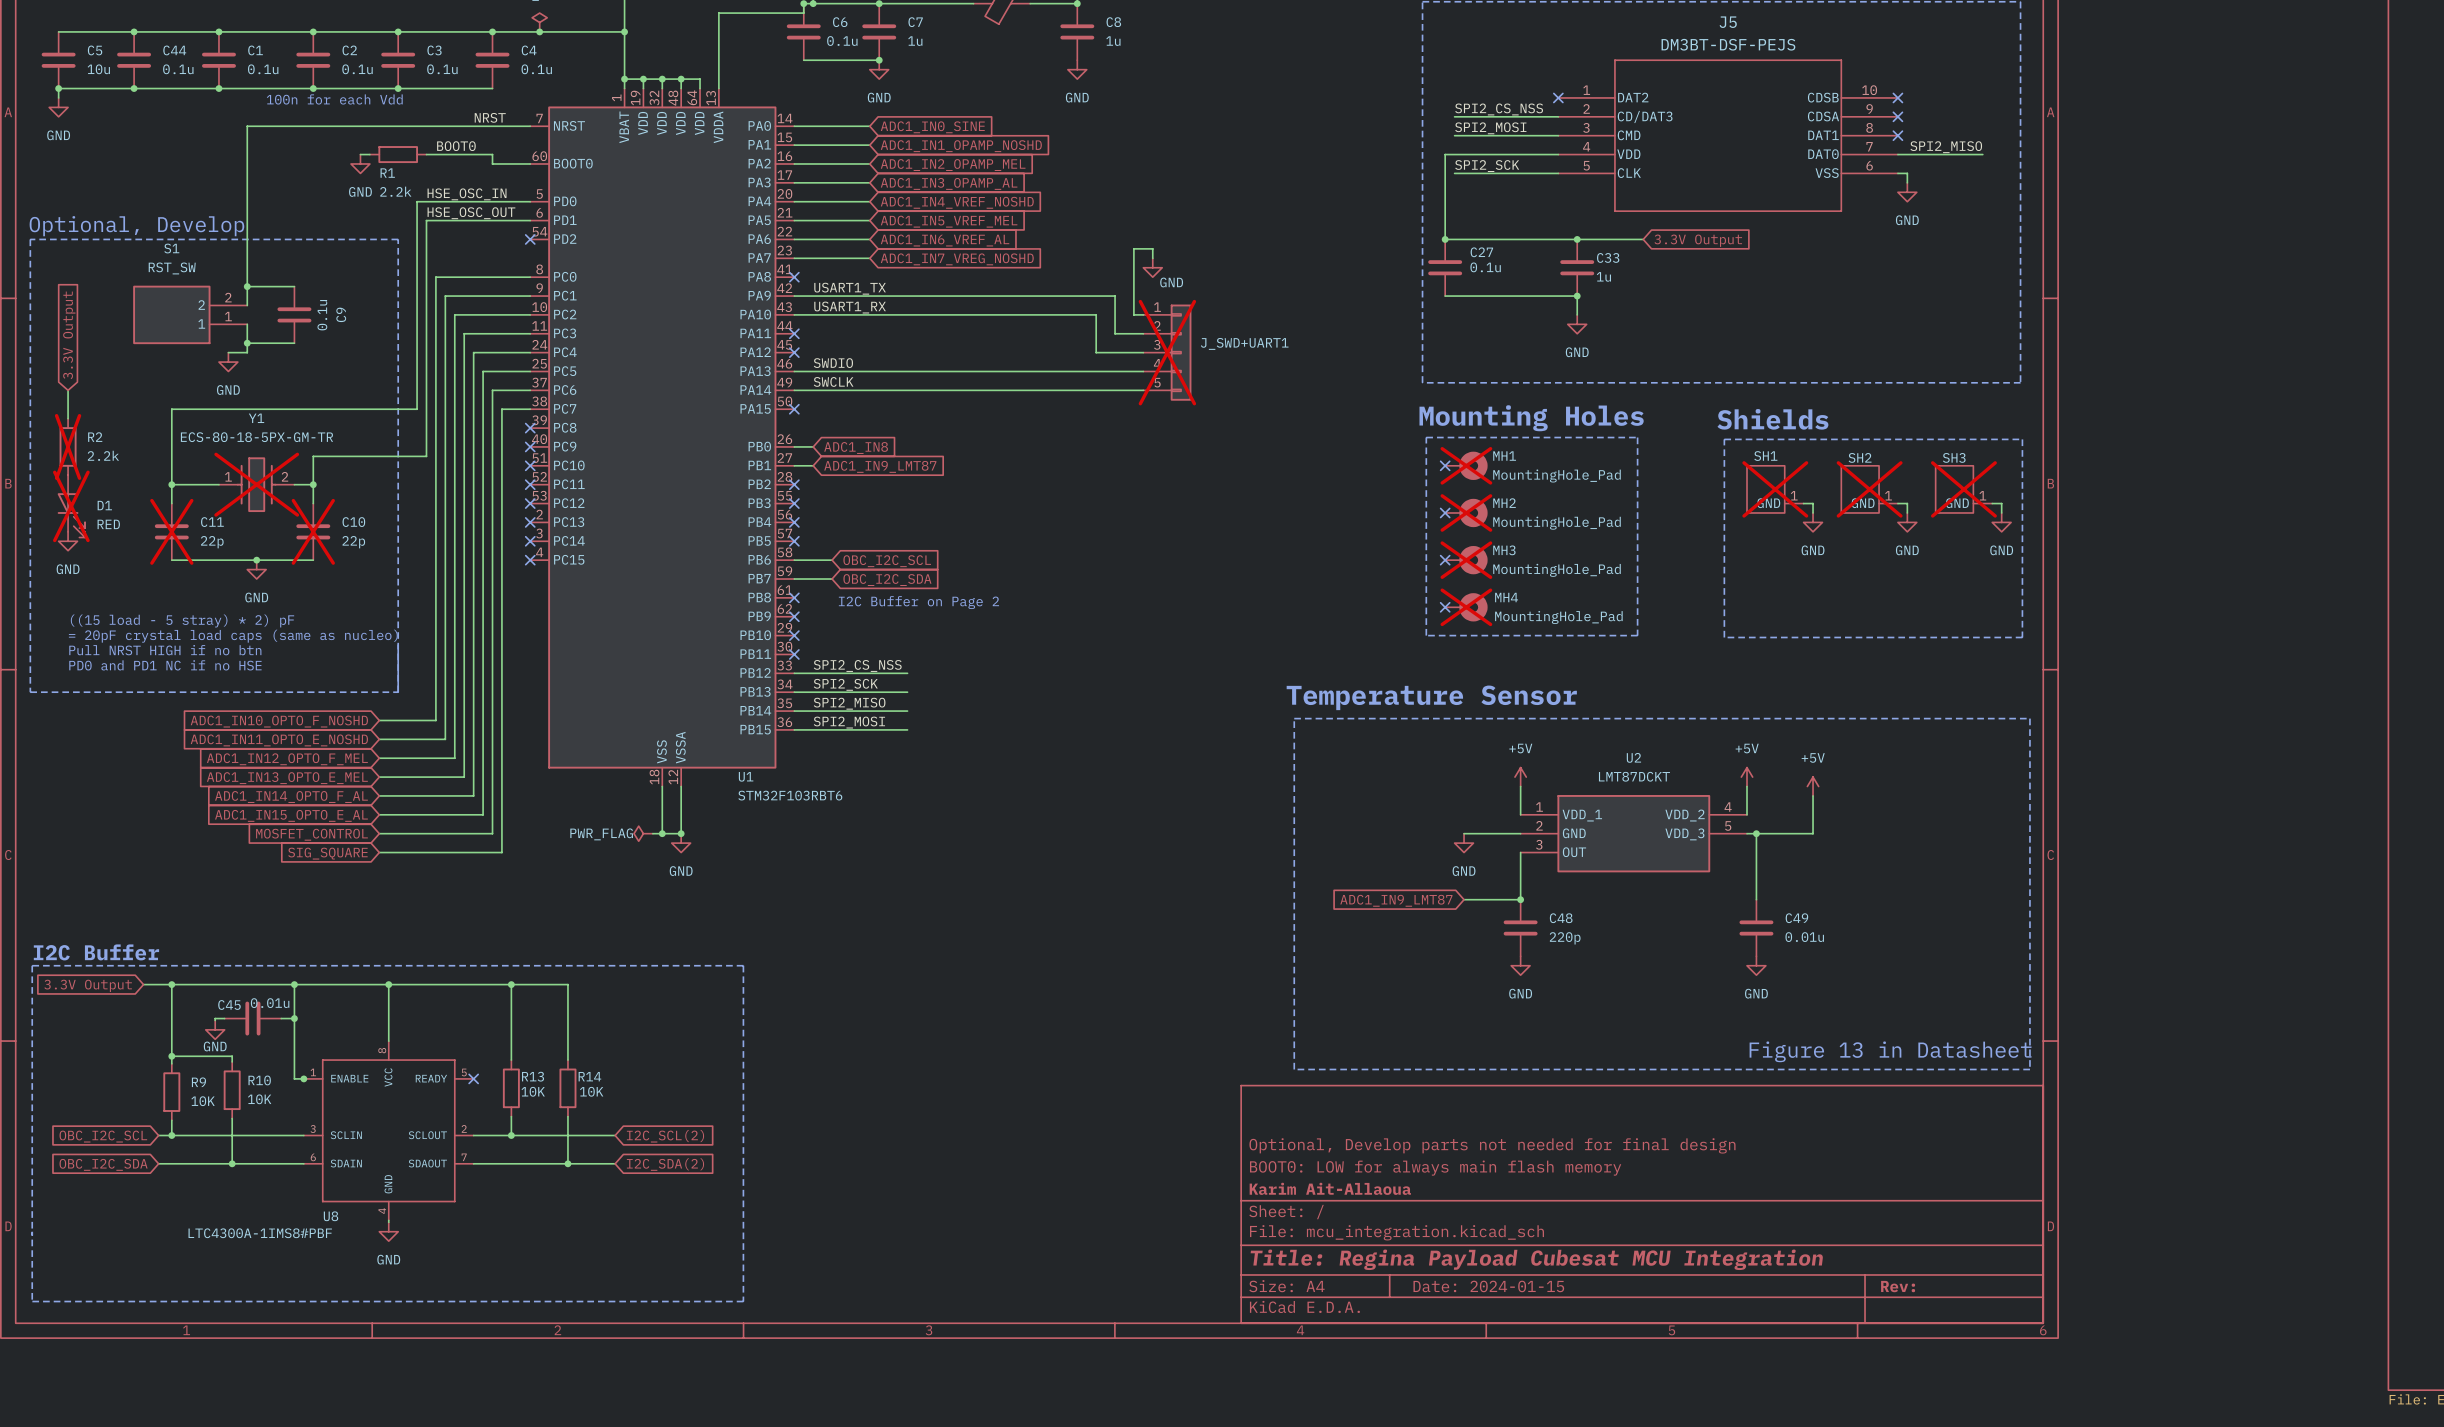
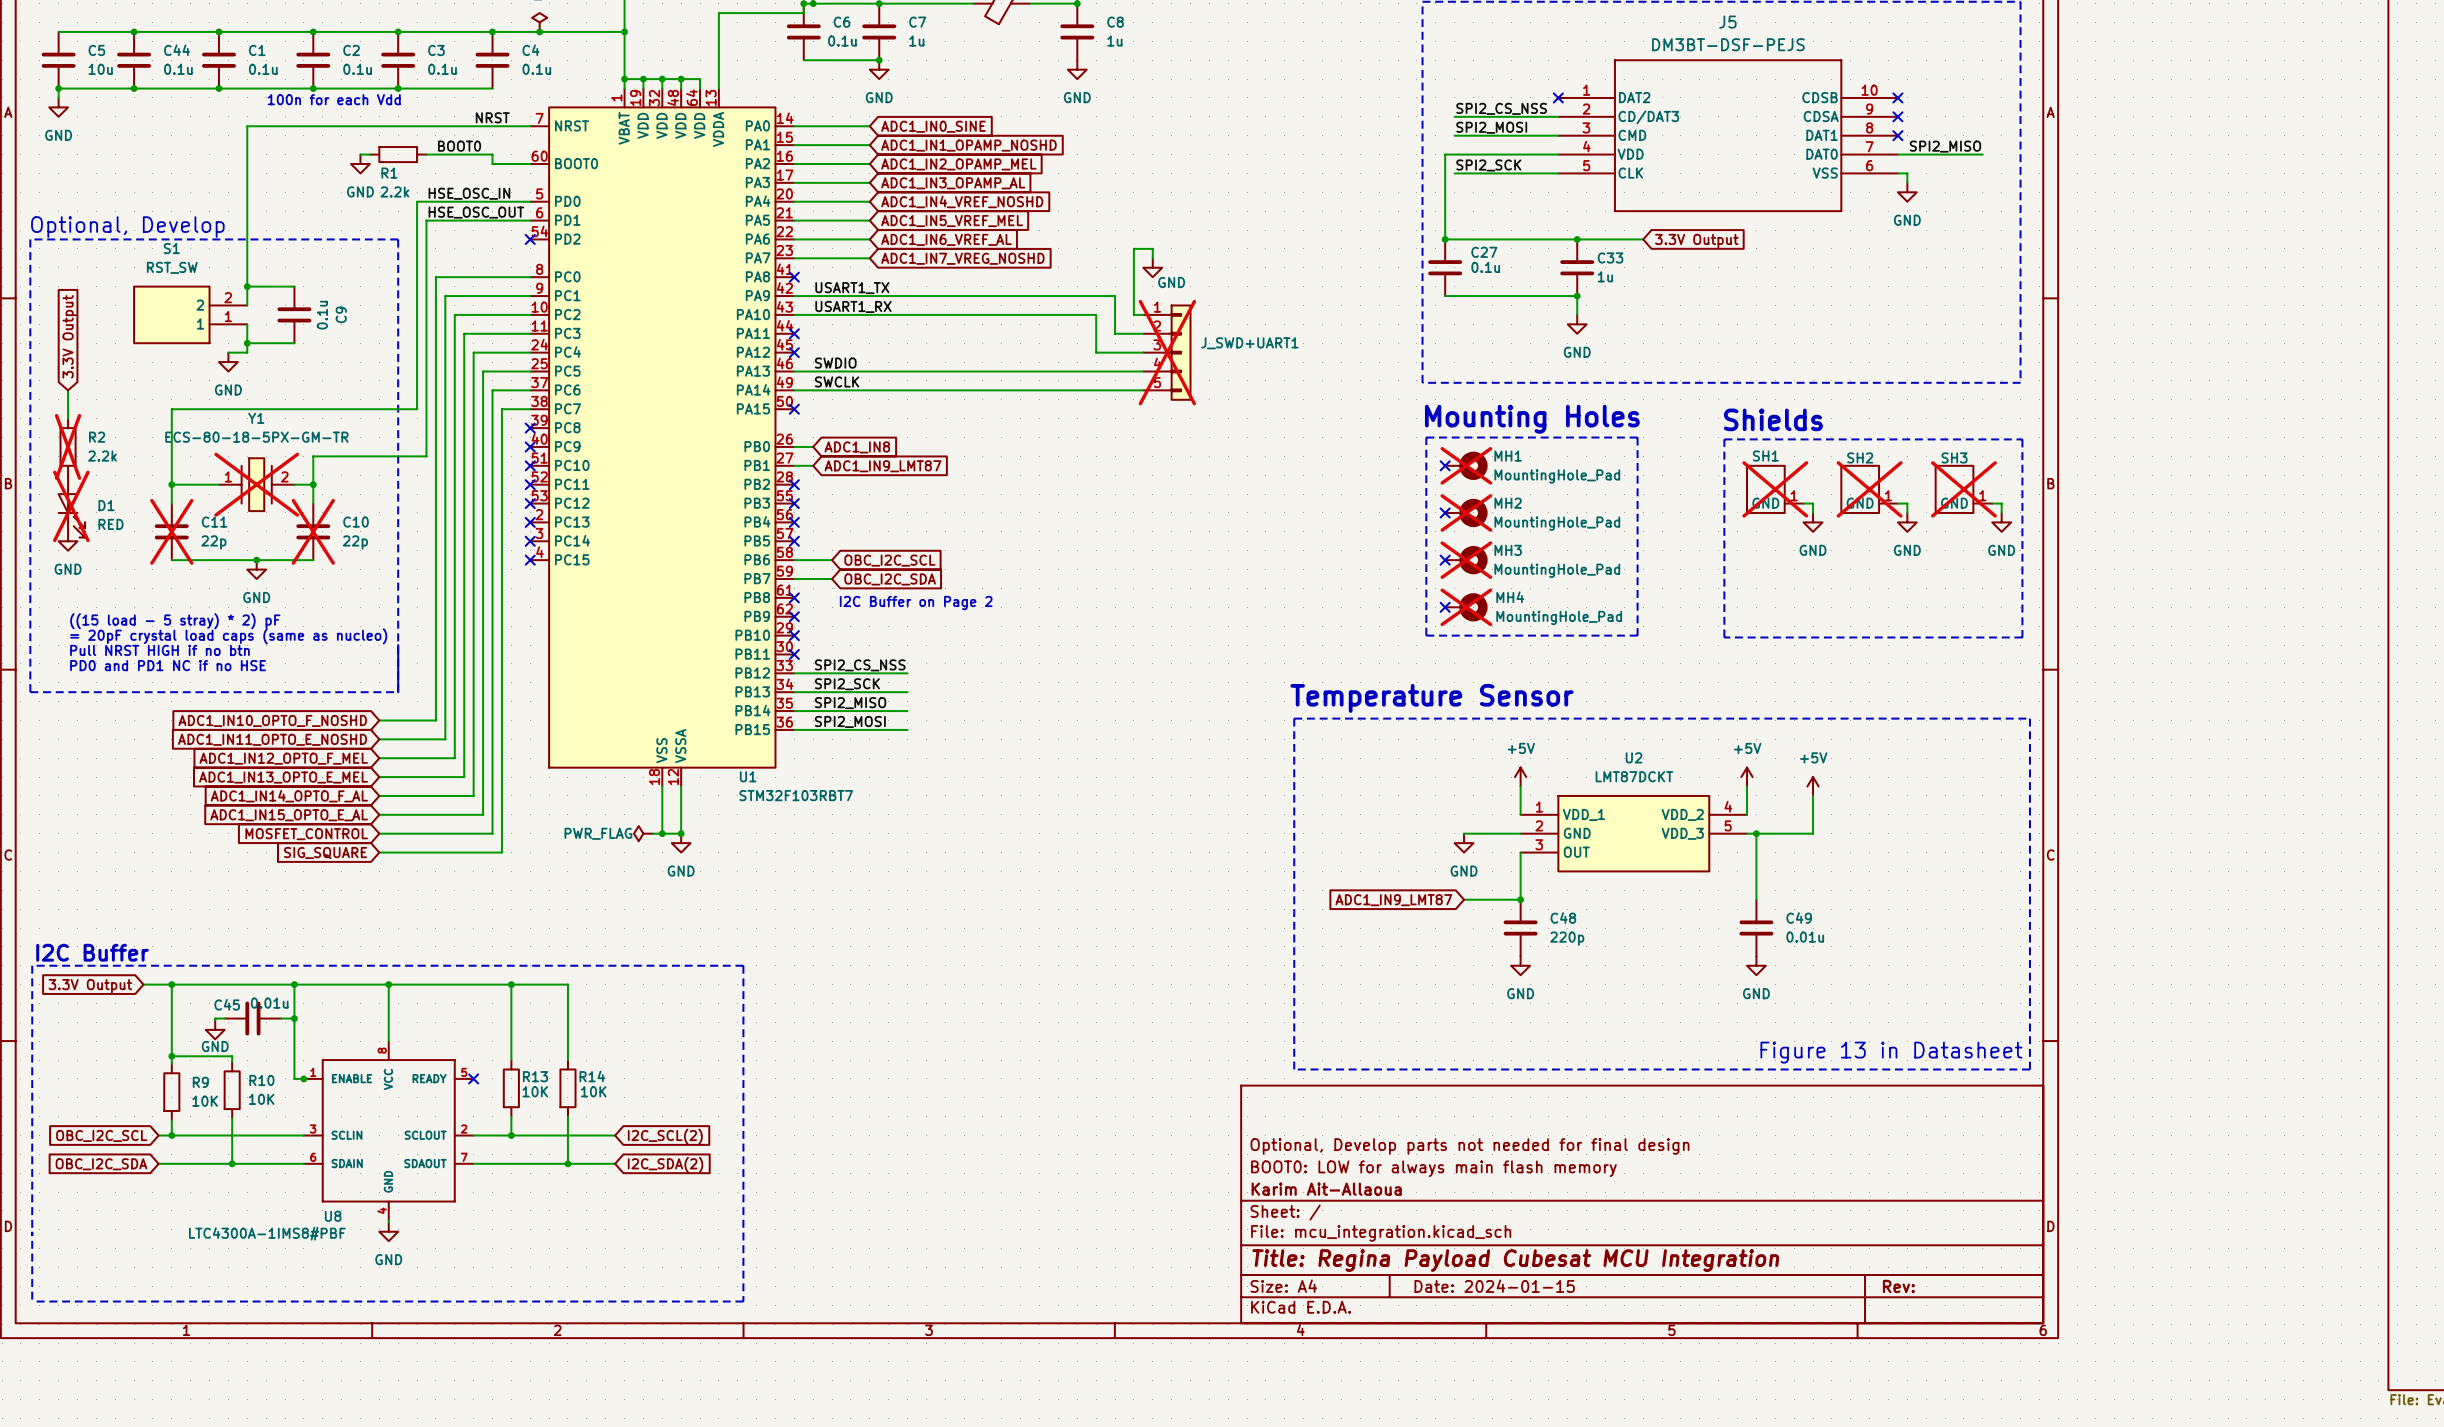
U1 value: STM32F103RBT6 (790, 795) -> STM32F103RBT7 (796, 795)

